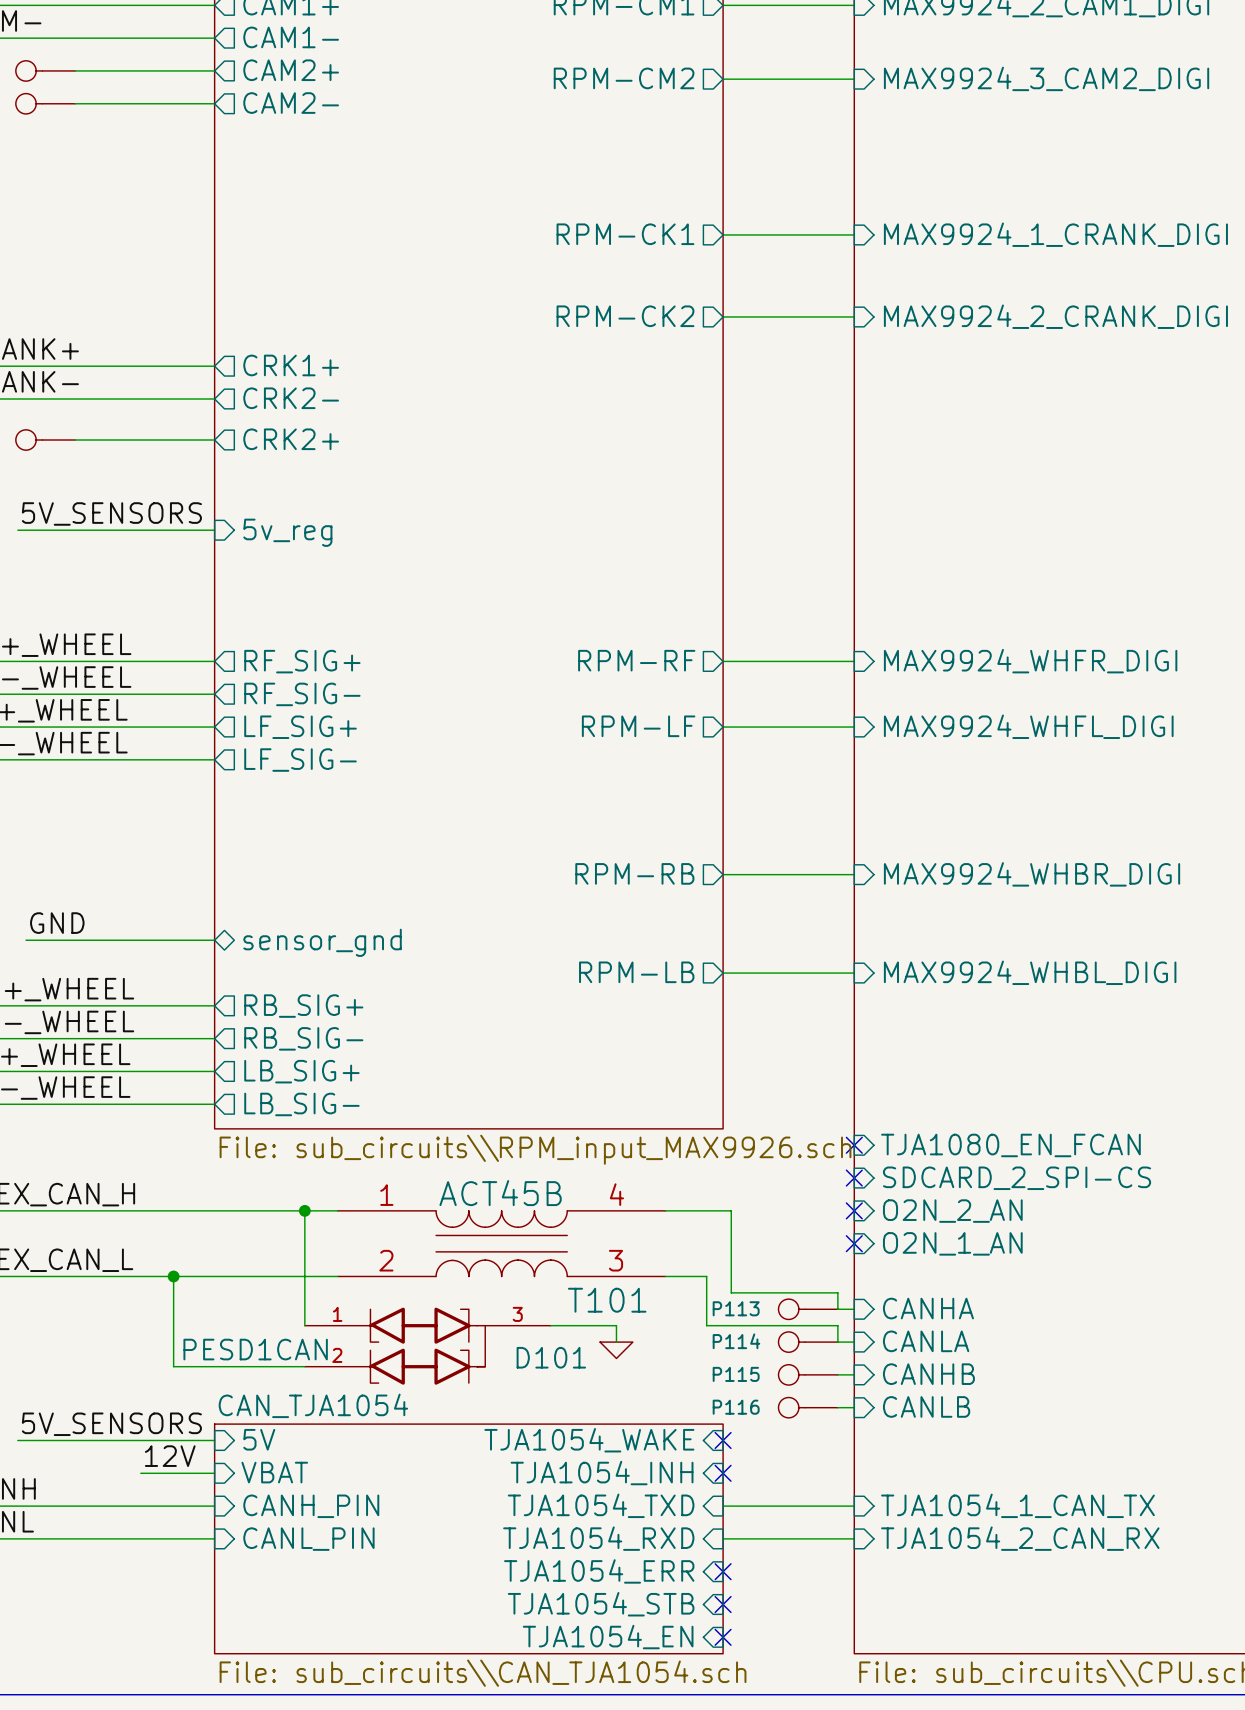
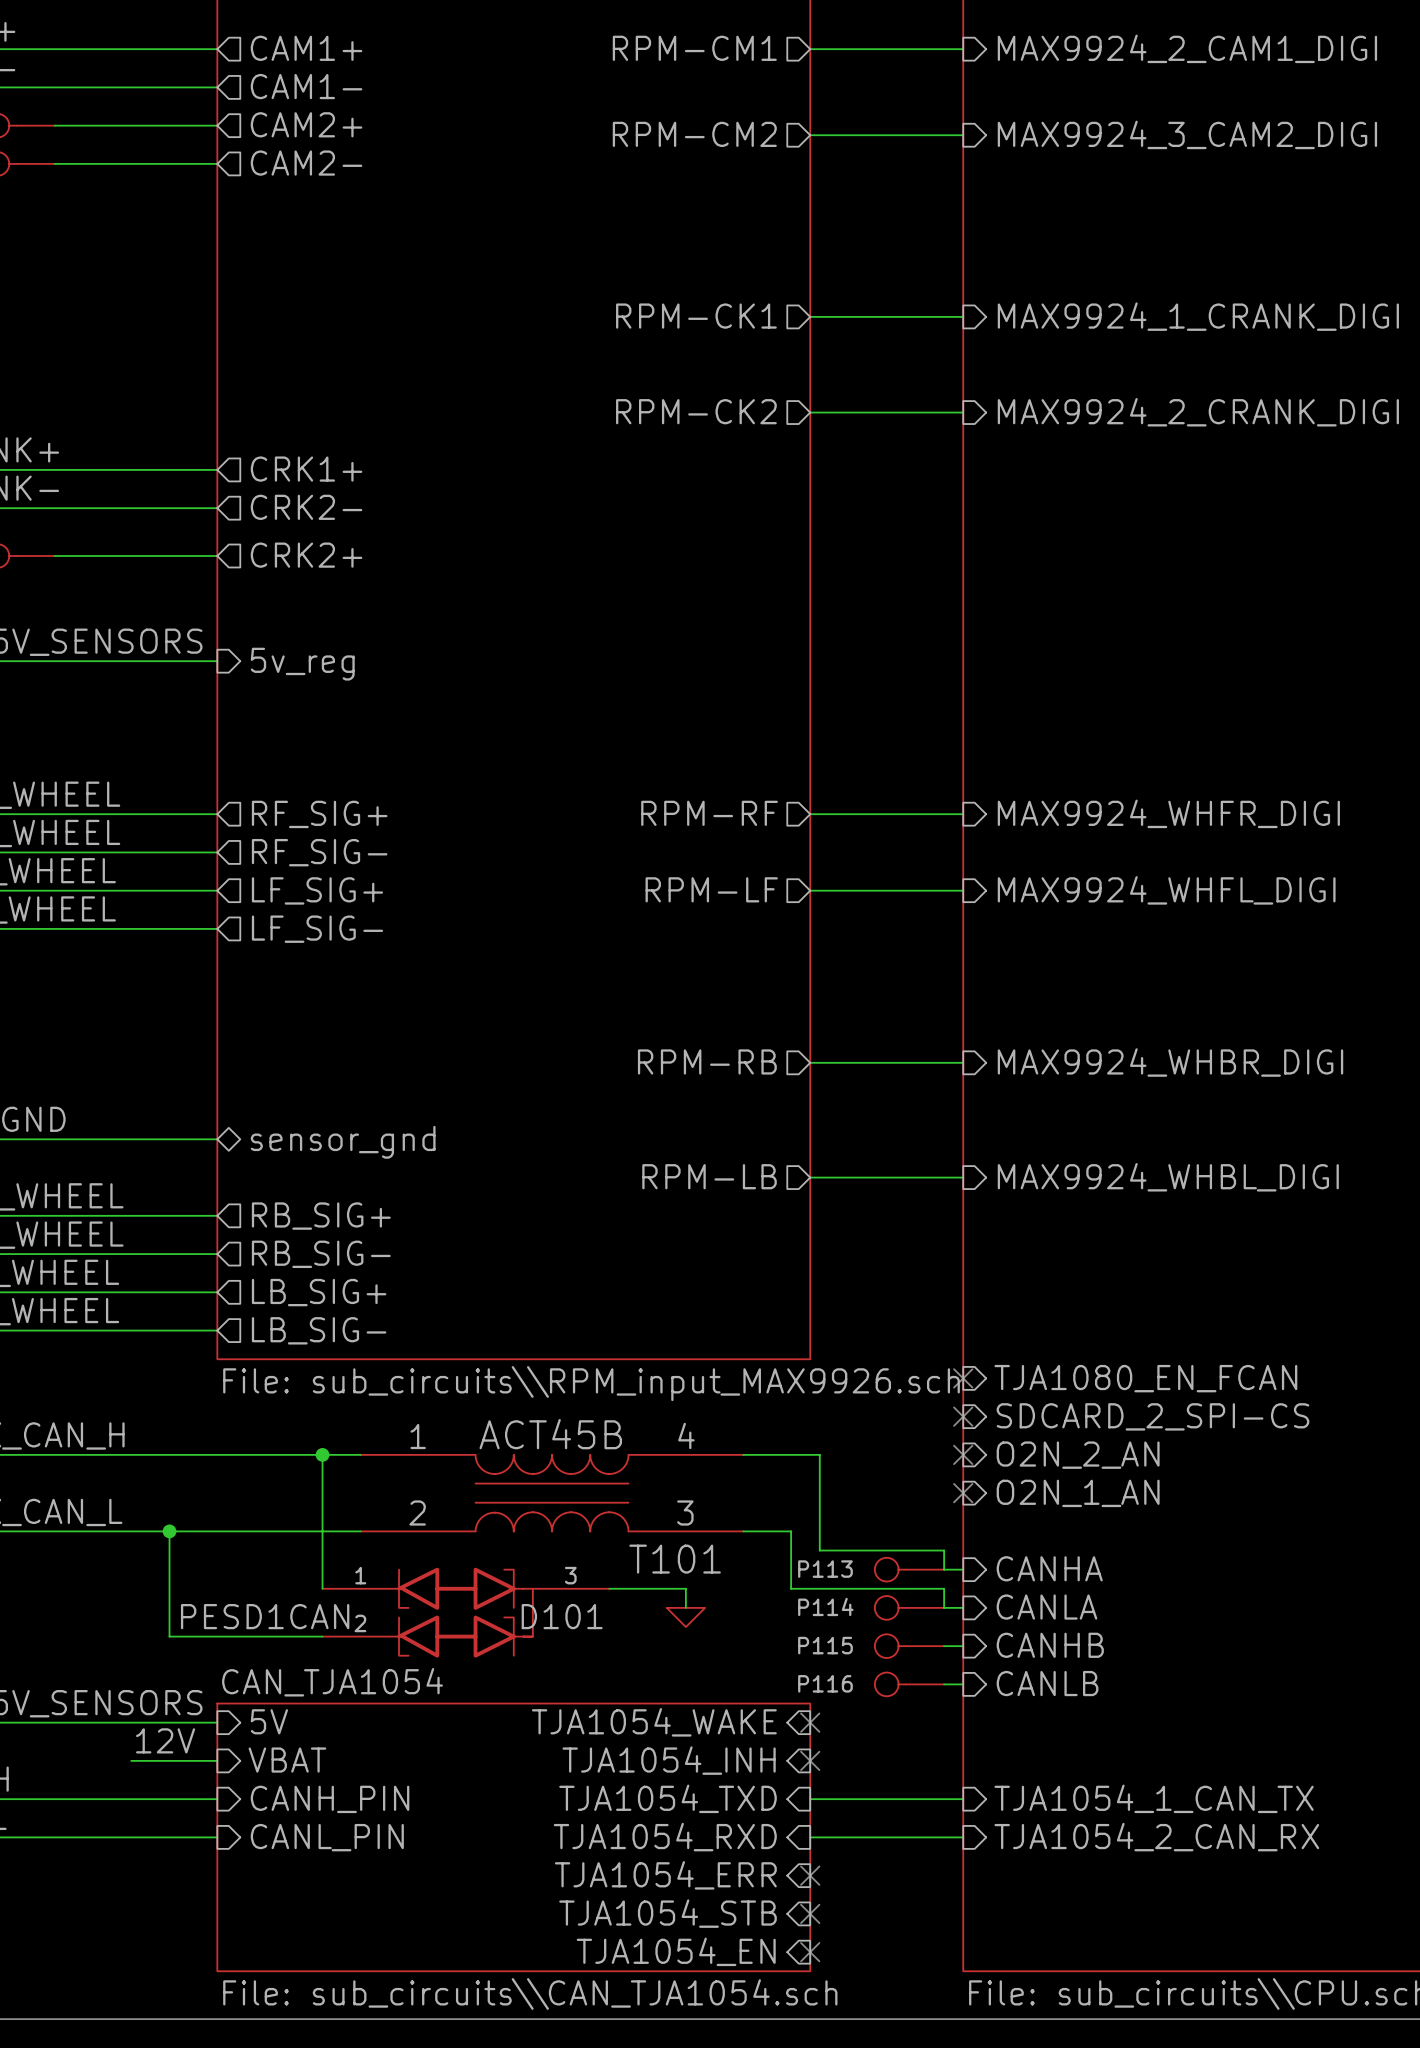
D101 name position: D101 (551, 1357) -> D101 (562, 1616)

